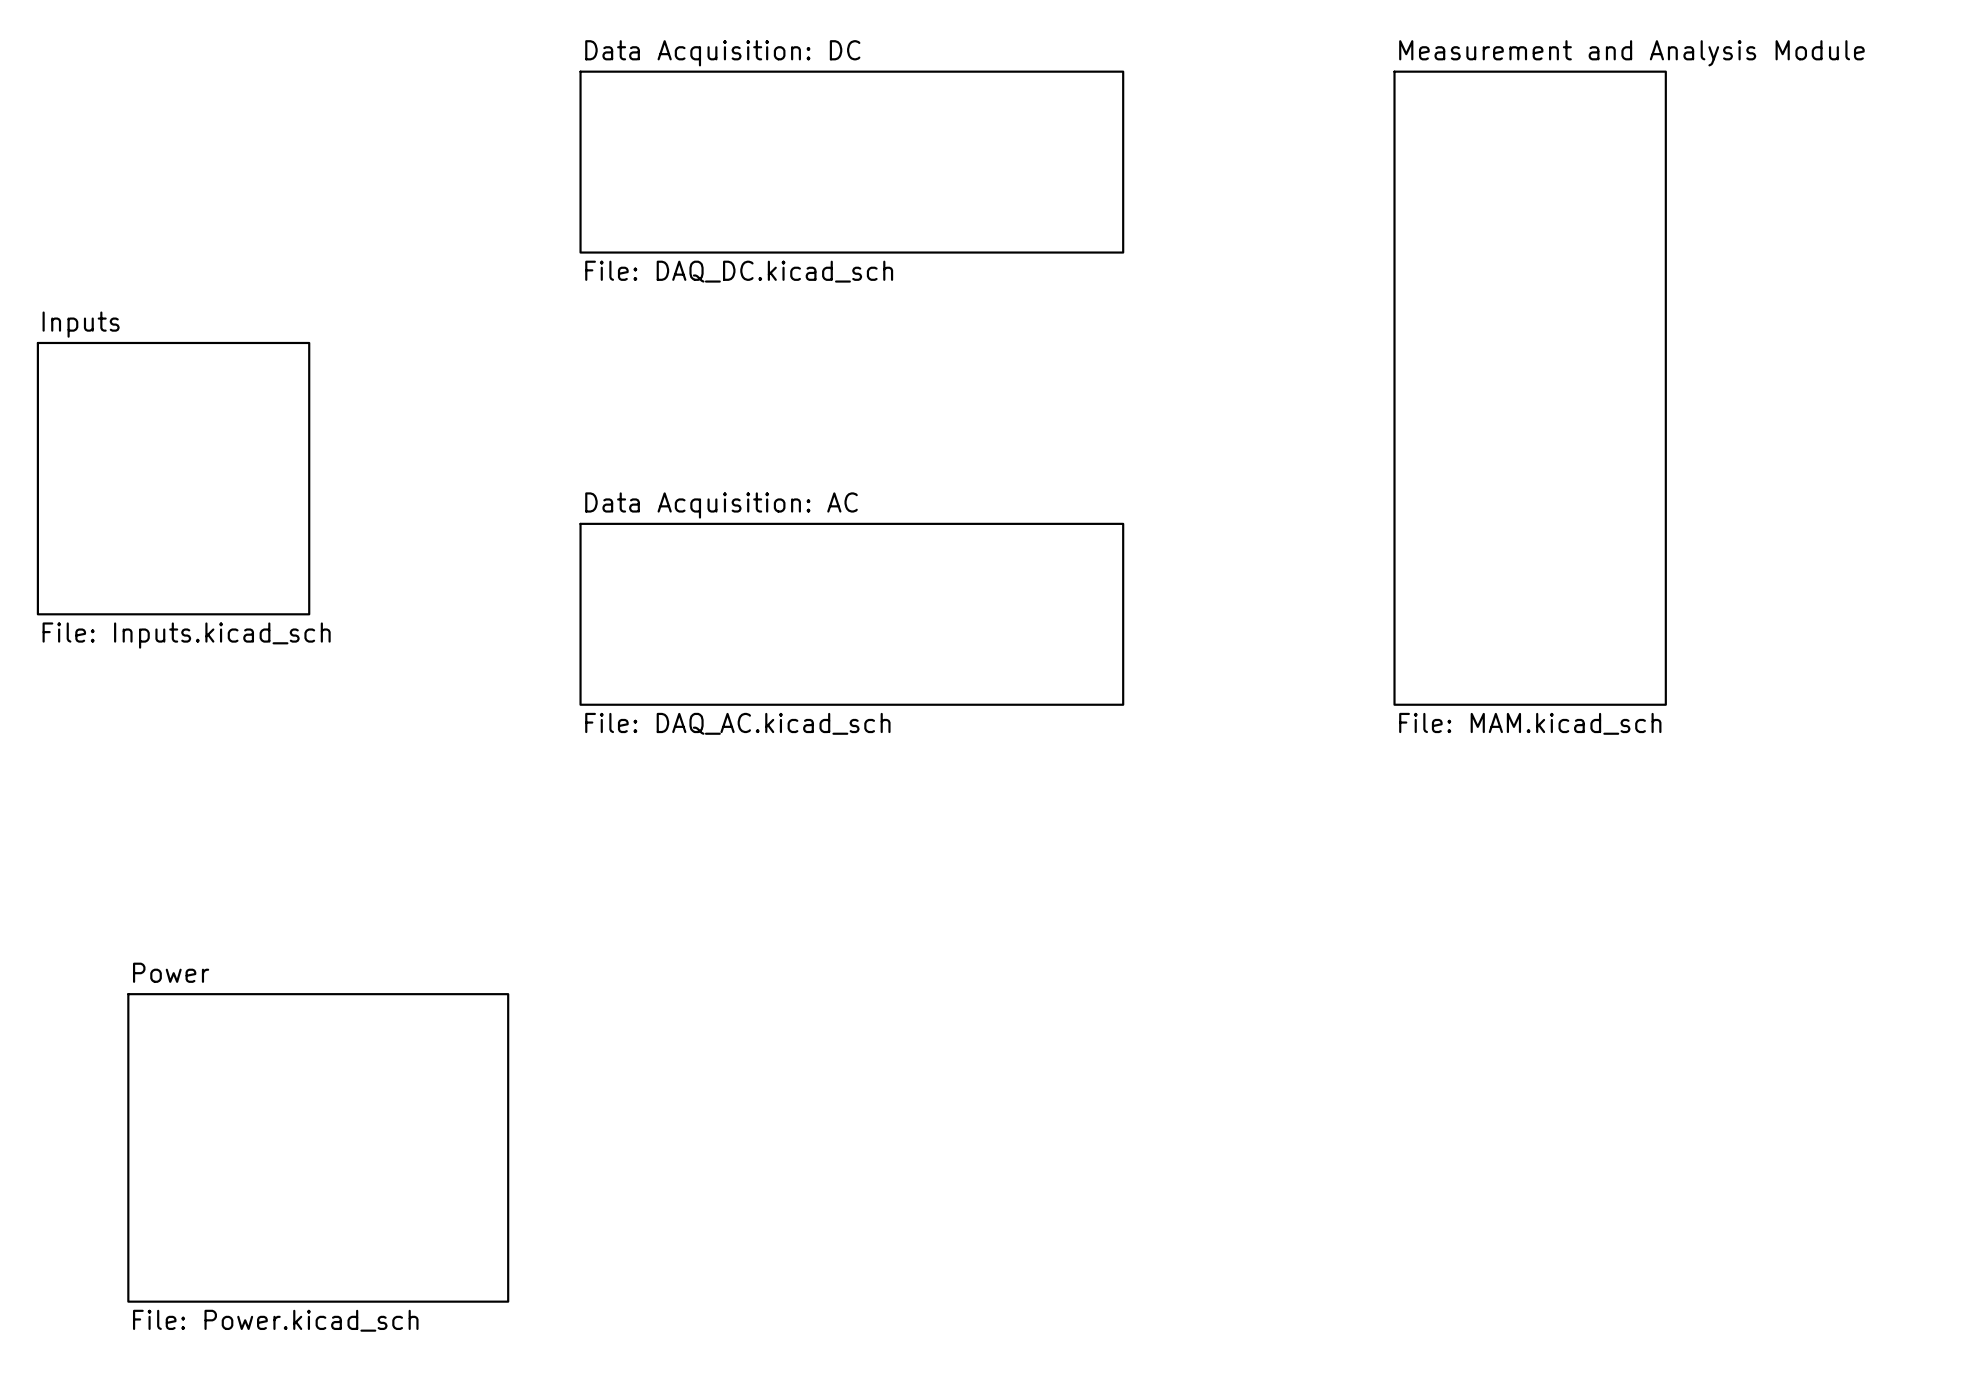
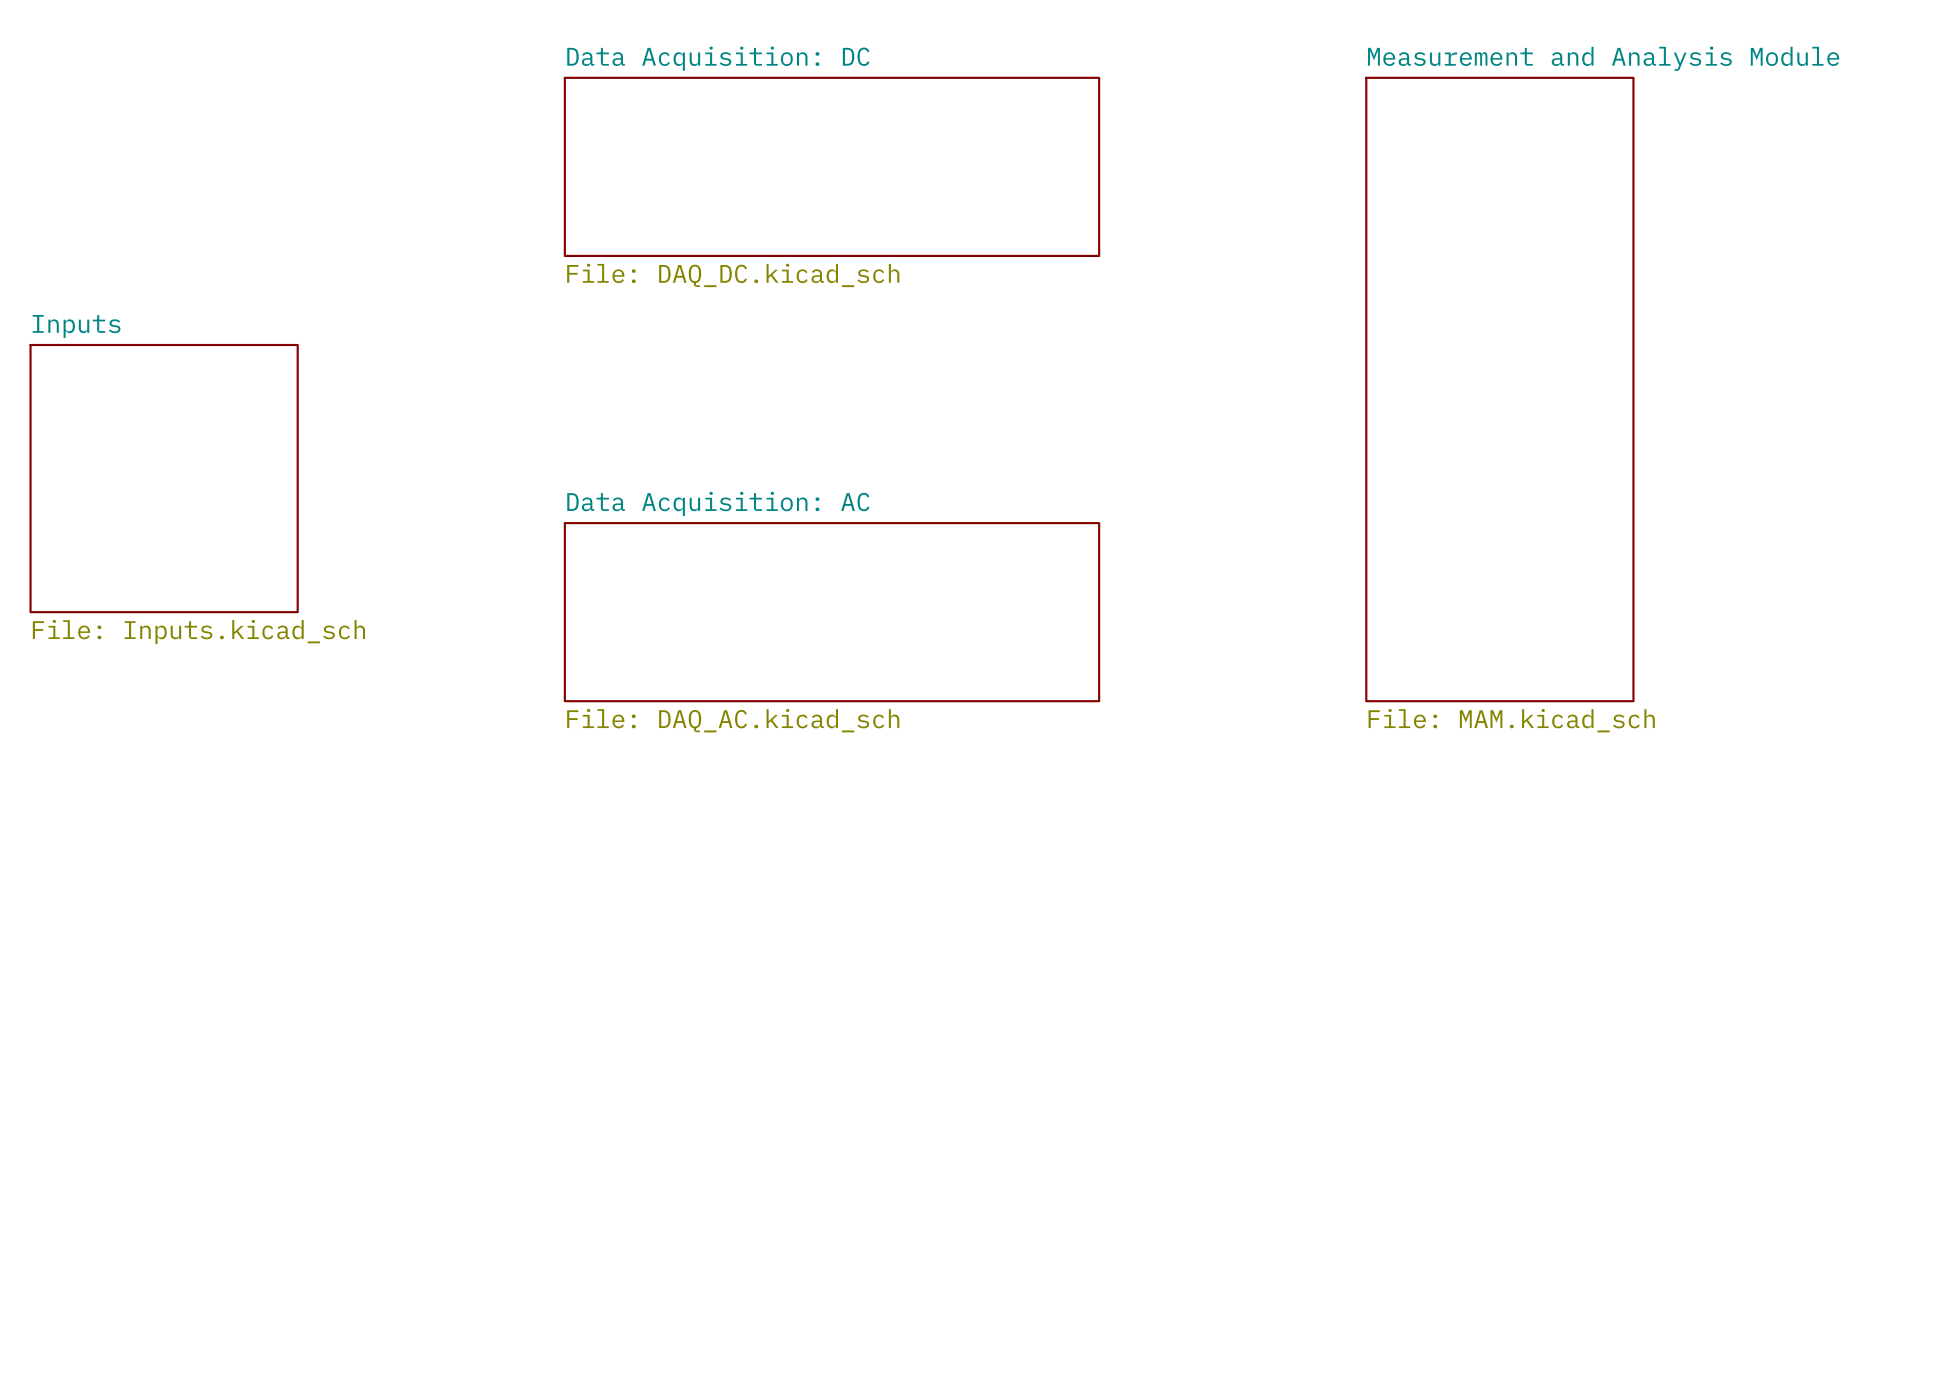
sheet Power: File: Power.kicad_sch (318, 1147) -> none

